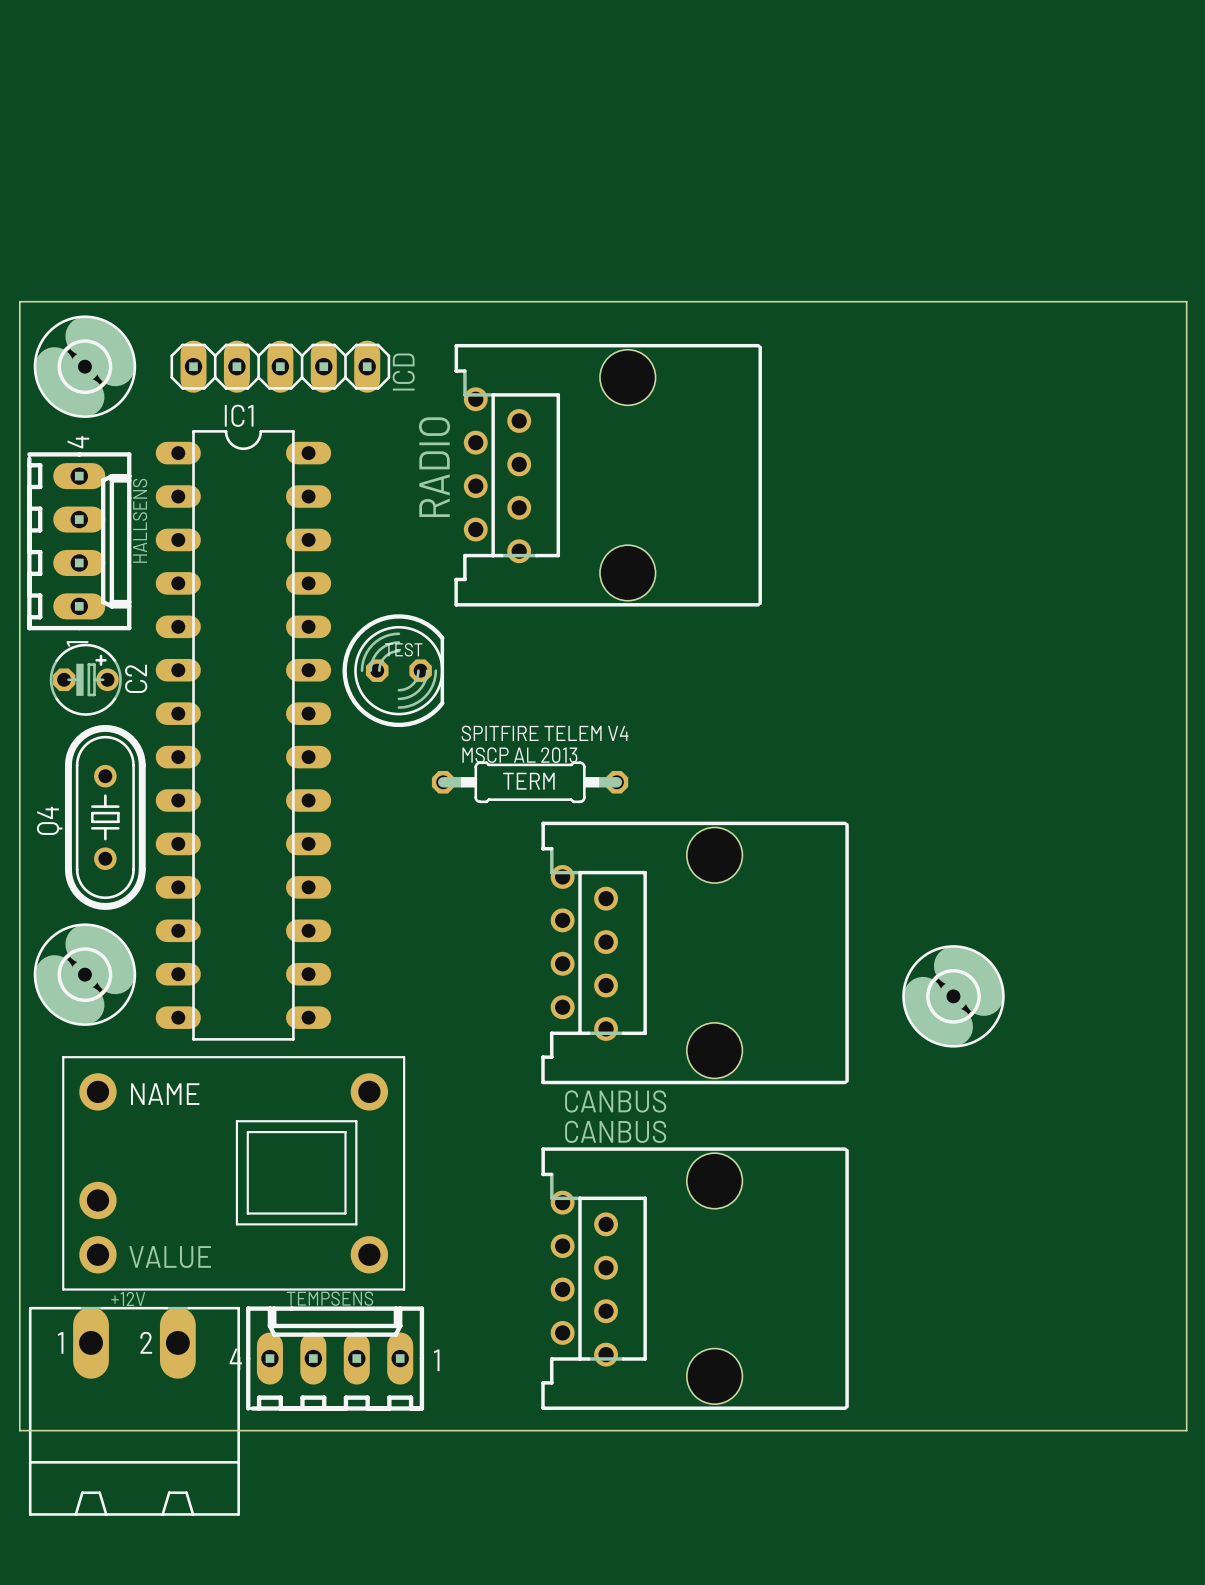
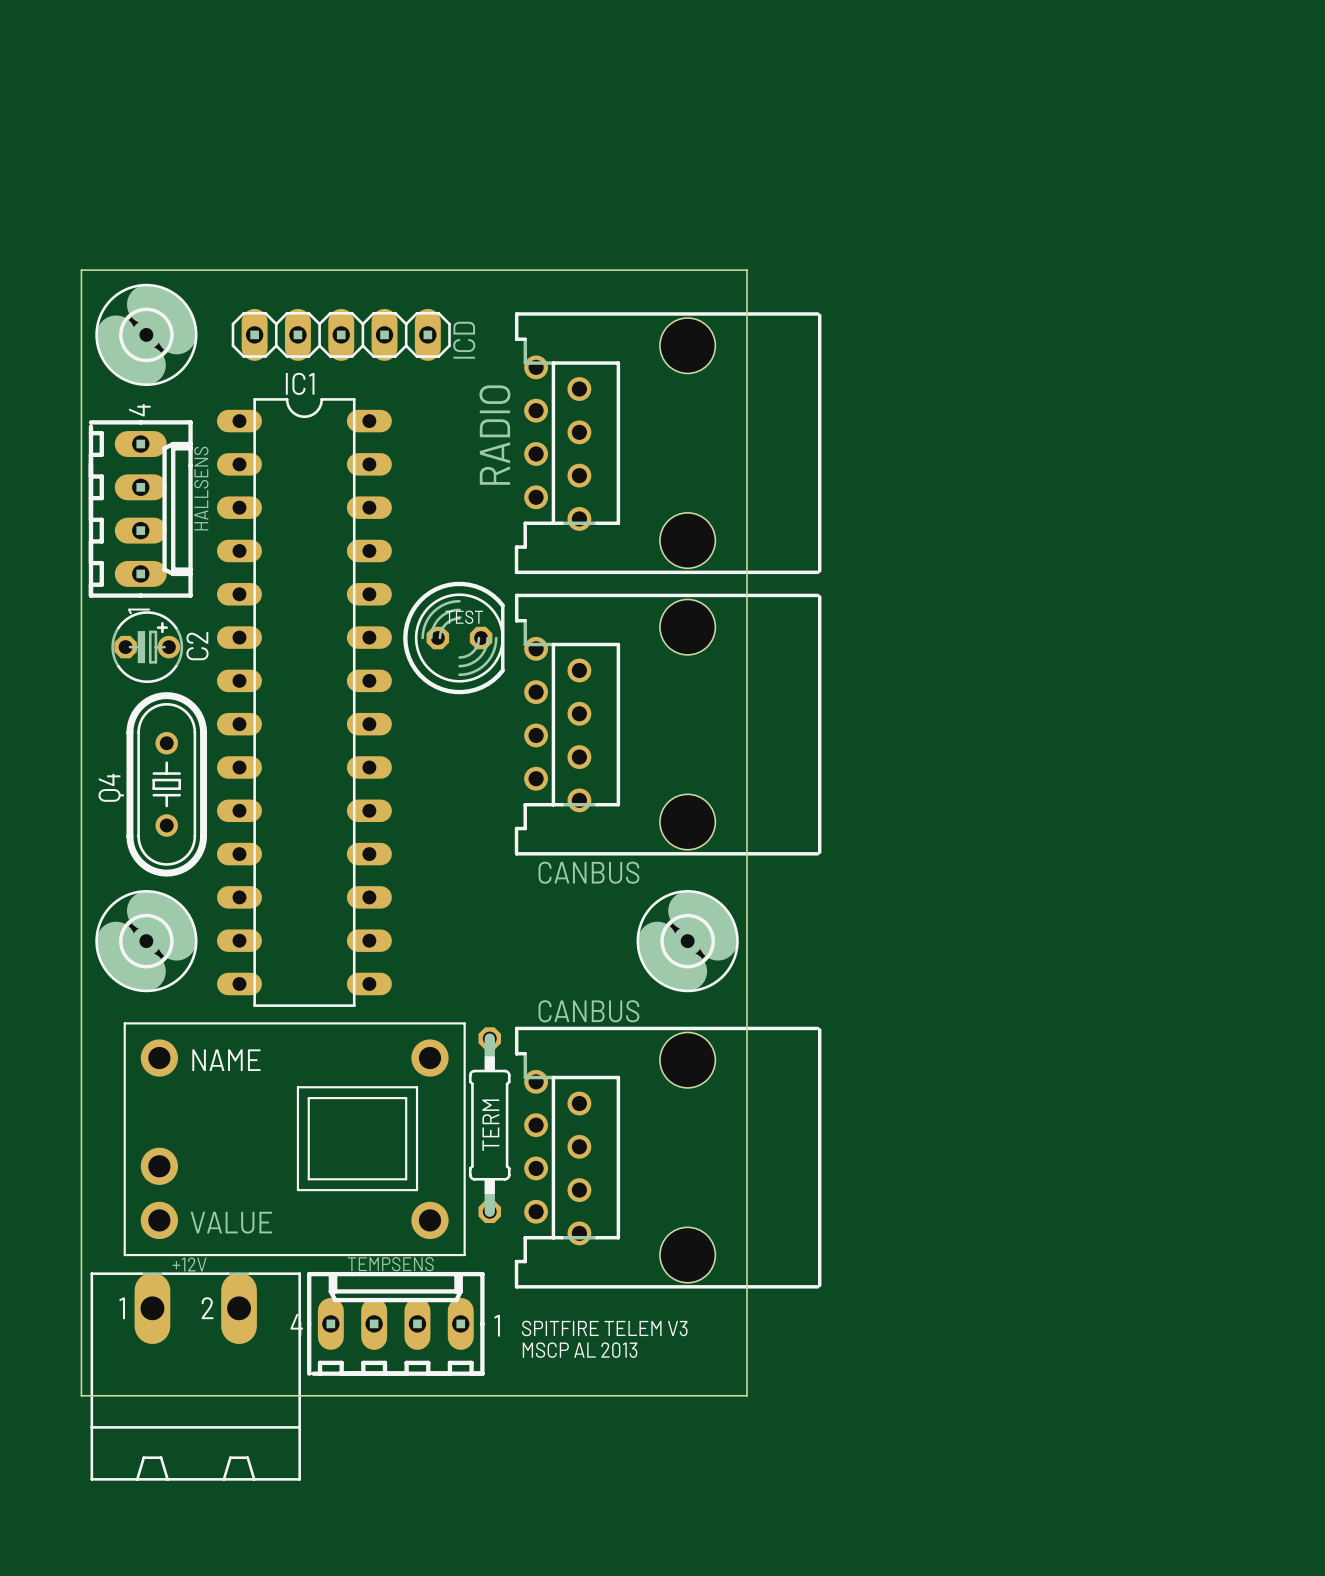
board edge: (687, 301) (1186, 301) (1186, 1430) (687, 1430) -> (746, 270) (746, 1395)
text: SPITFIRE TELEM V4 (545, 733) -> none
text: MSCP AL 2013 (519, 755) -> none
part: none -> CANBUS (668, 724)
TERM rotation: 0° (530, 782) -> 90° clockwise (489, 1125)
TERM position: (530, 782) -> (489, 1125)
part: CANBUS (695, 952) -> none
part position: (953, 996) -> (687, 941)
part position: (695, 1278) -> (668, 1157)
text: none -> SPITFIRE TELEM V3 (604, 1328)
text: none -> MSCP AL 2013 (580, 1350)

